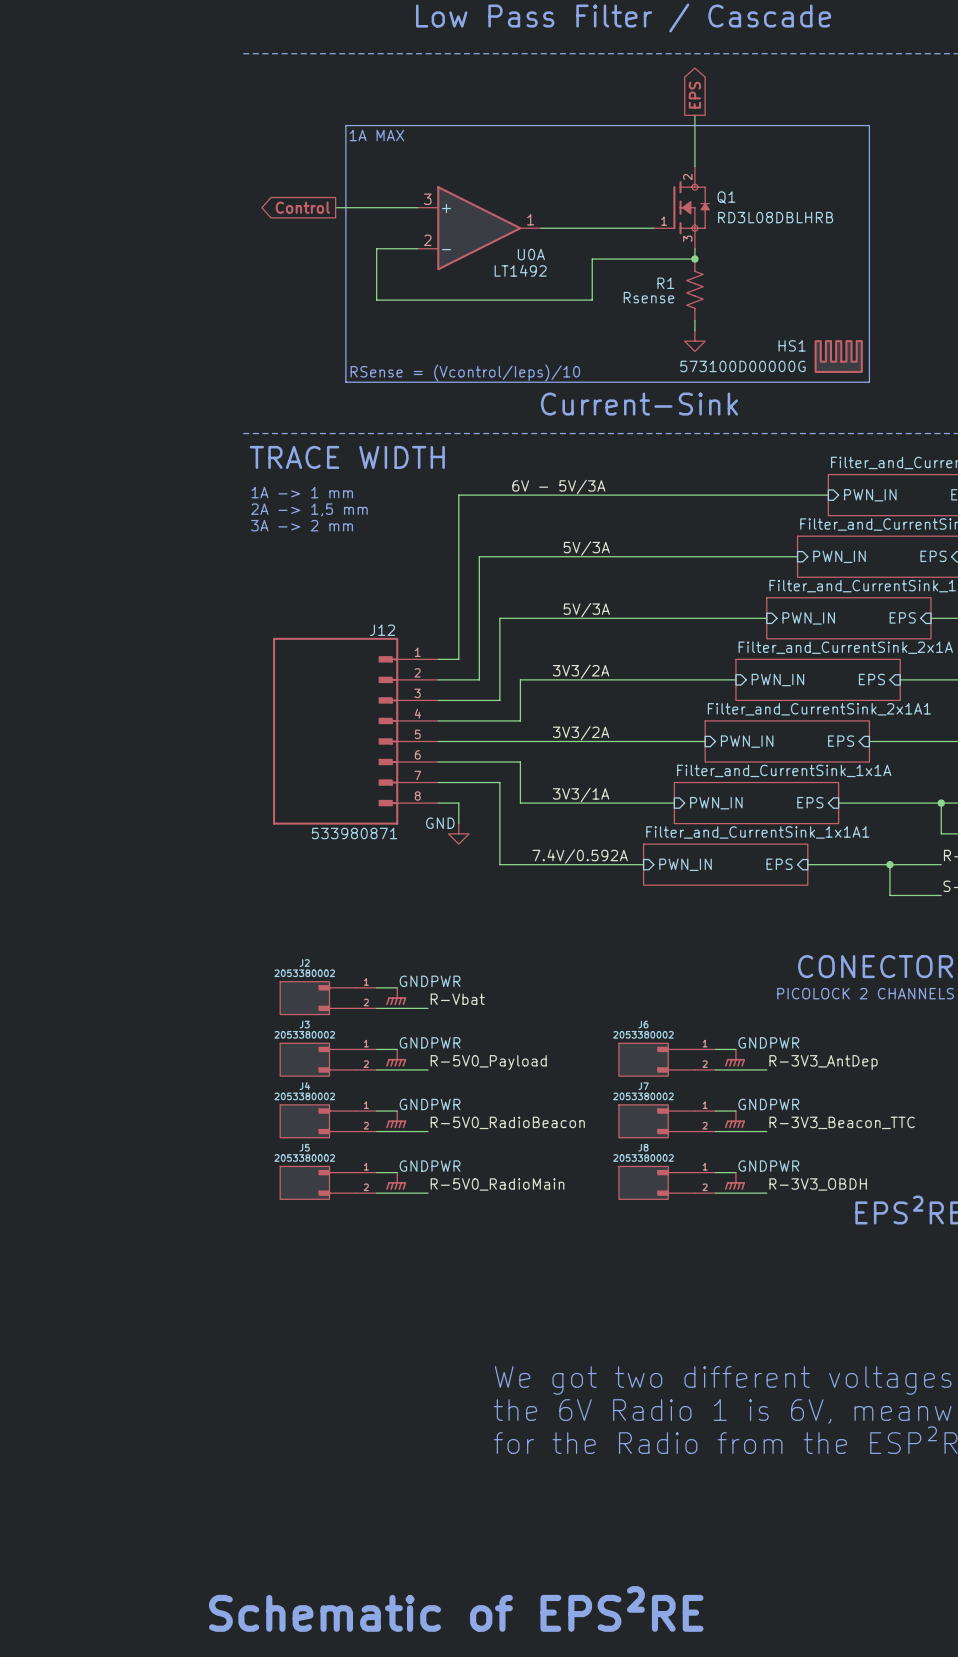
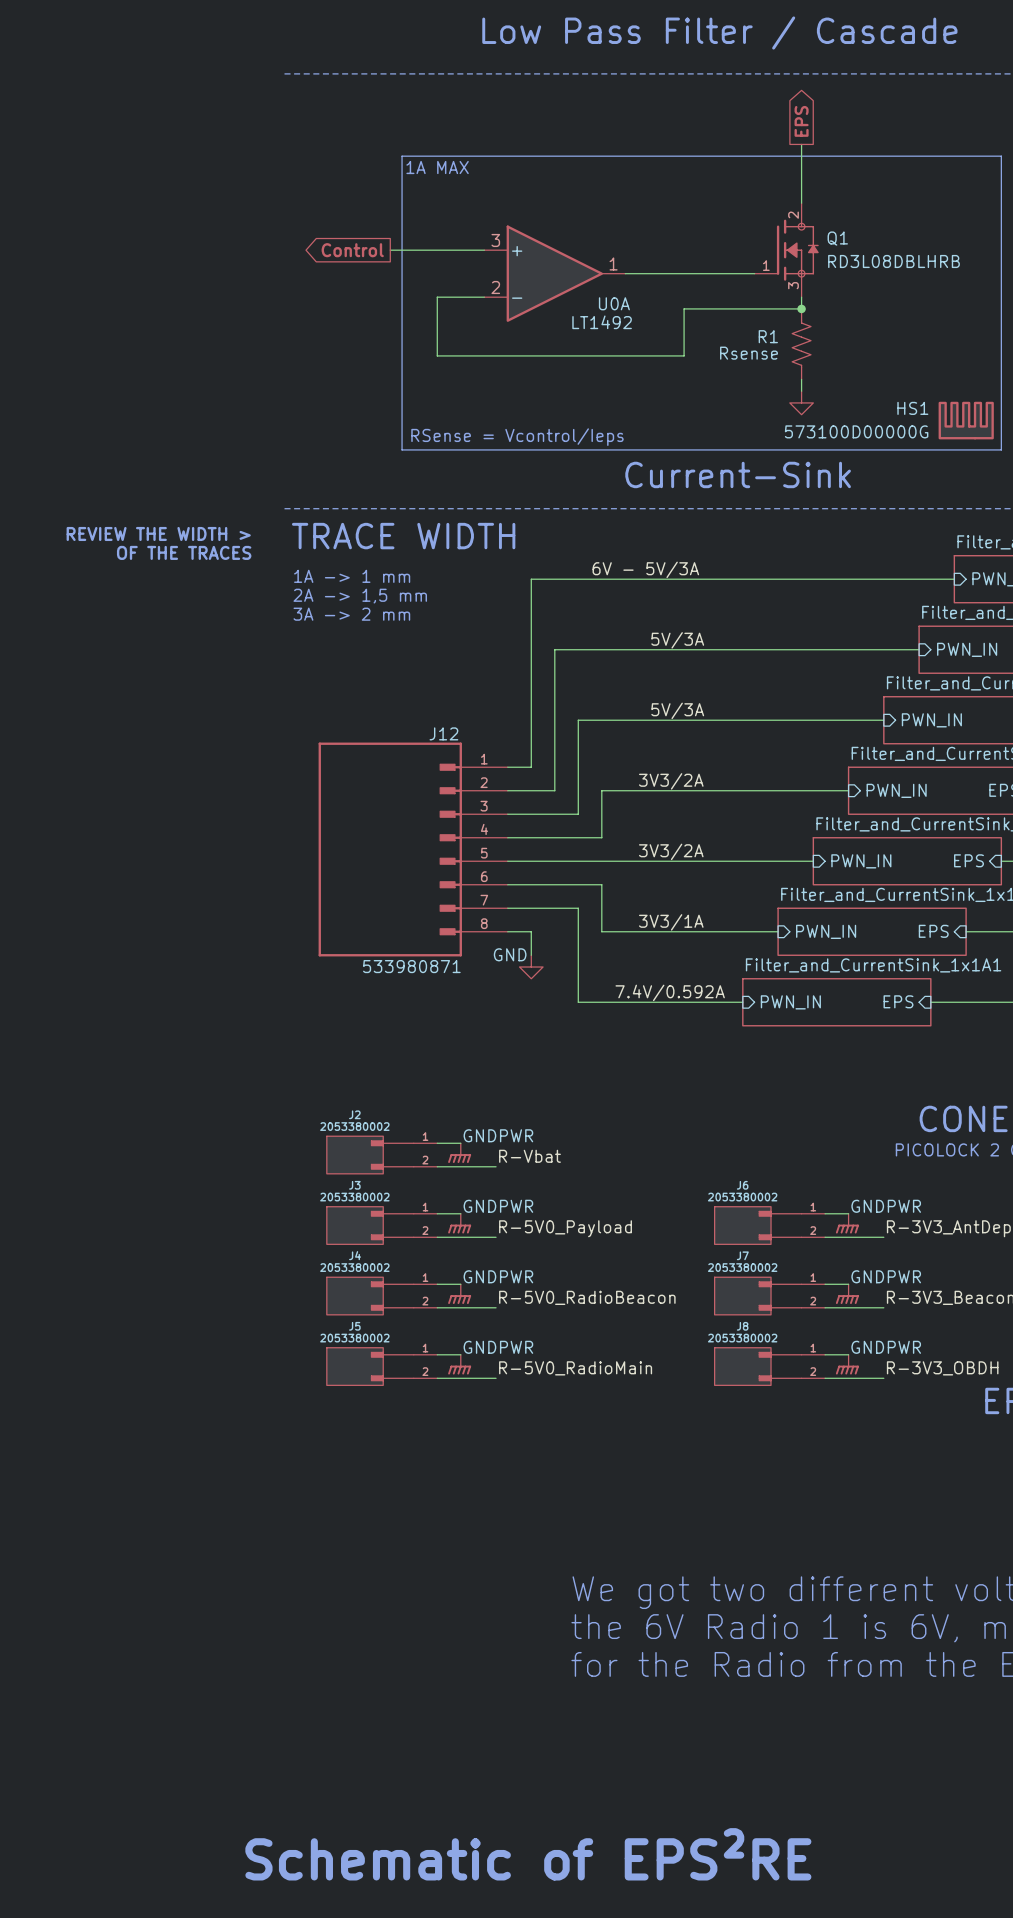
text: RSense = (Vcontrol/Ieps)/10 (465, 372) -> RSense = Vcontrol/Ieps (517, 437)
text: none -> REVIEW THE WIDTH > (158, 533)
text: none -> OF THE TRACES (184, 552)

